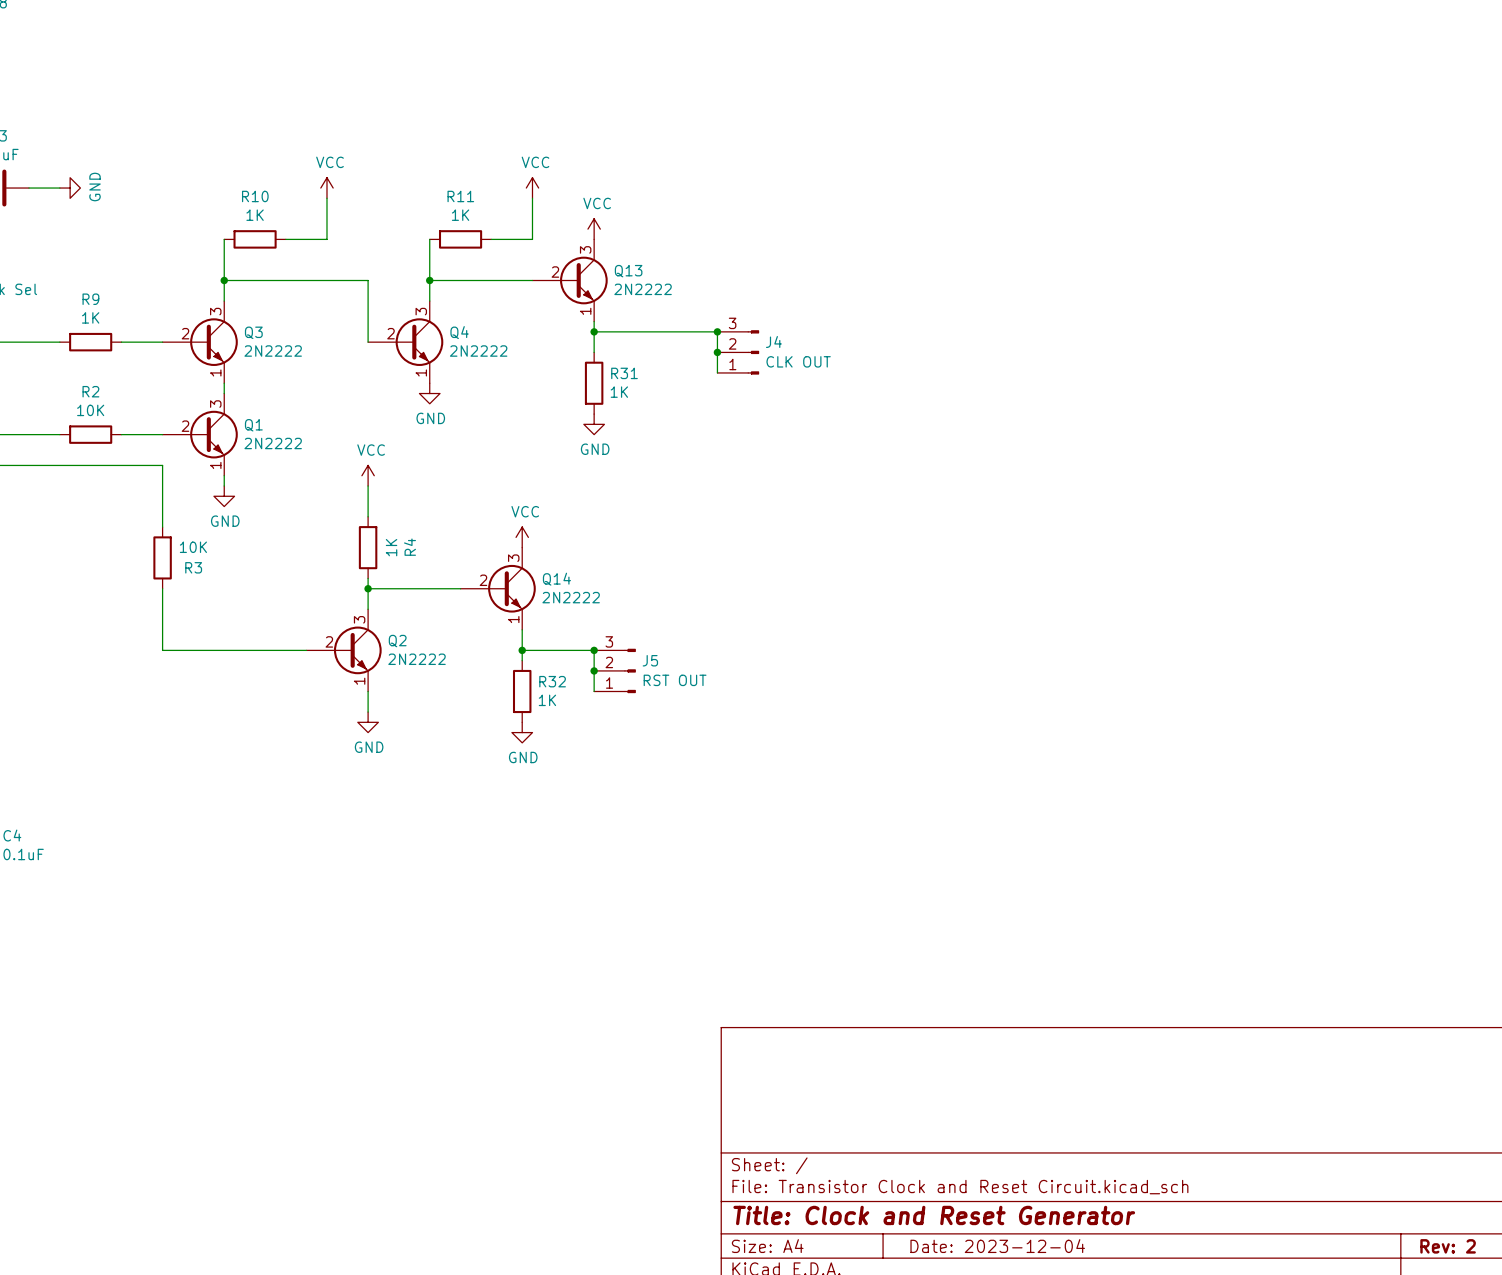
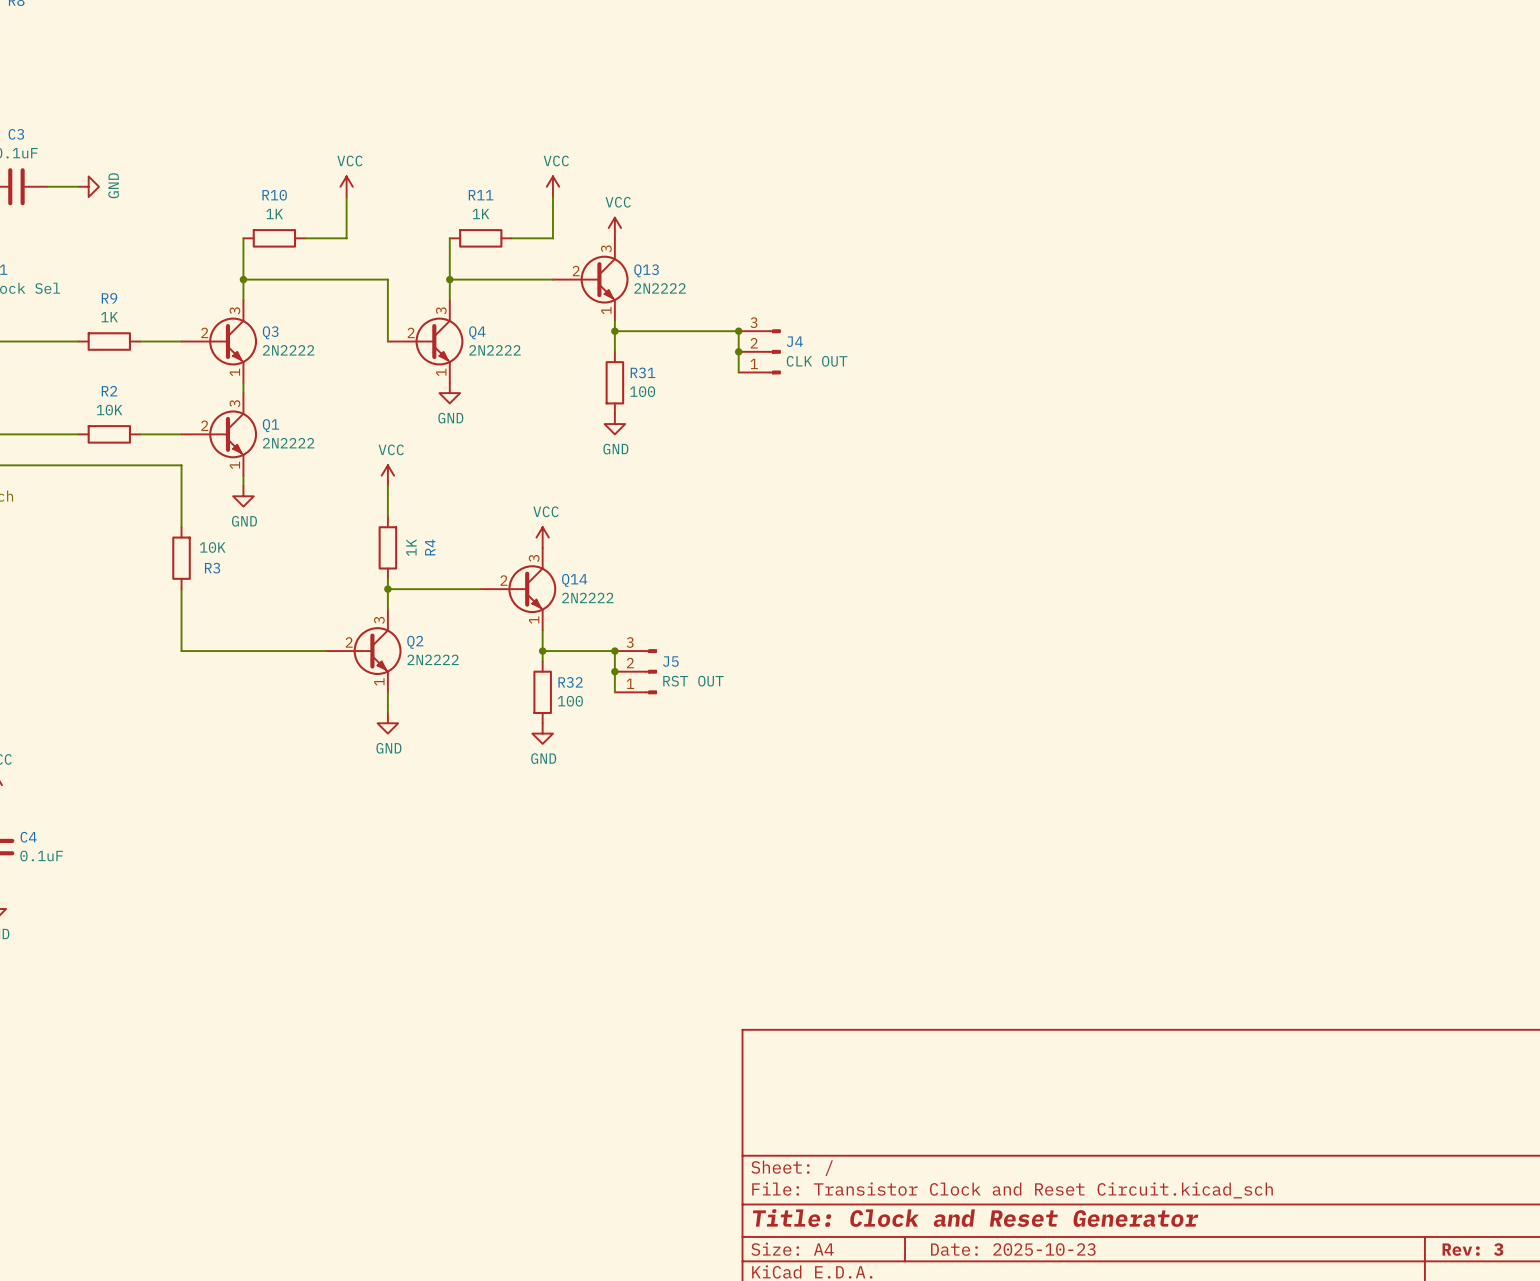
R31 value: 1K (619, 392) -> 100 (642, 391)
R32 value: 1K (547, 700) -> 100 (570, 701)
title block: Date: 2023-12-04 (997, 1246) -> Date: 2025-10-23 (1013, 1249)
title block: Rev: 2 (1448, 1246) -> Rev: 3 (1472, 1249)

